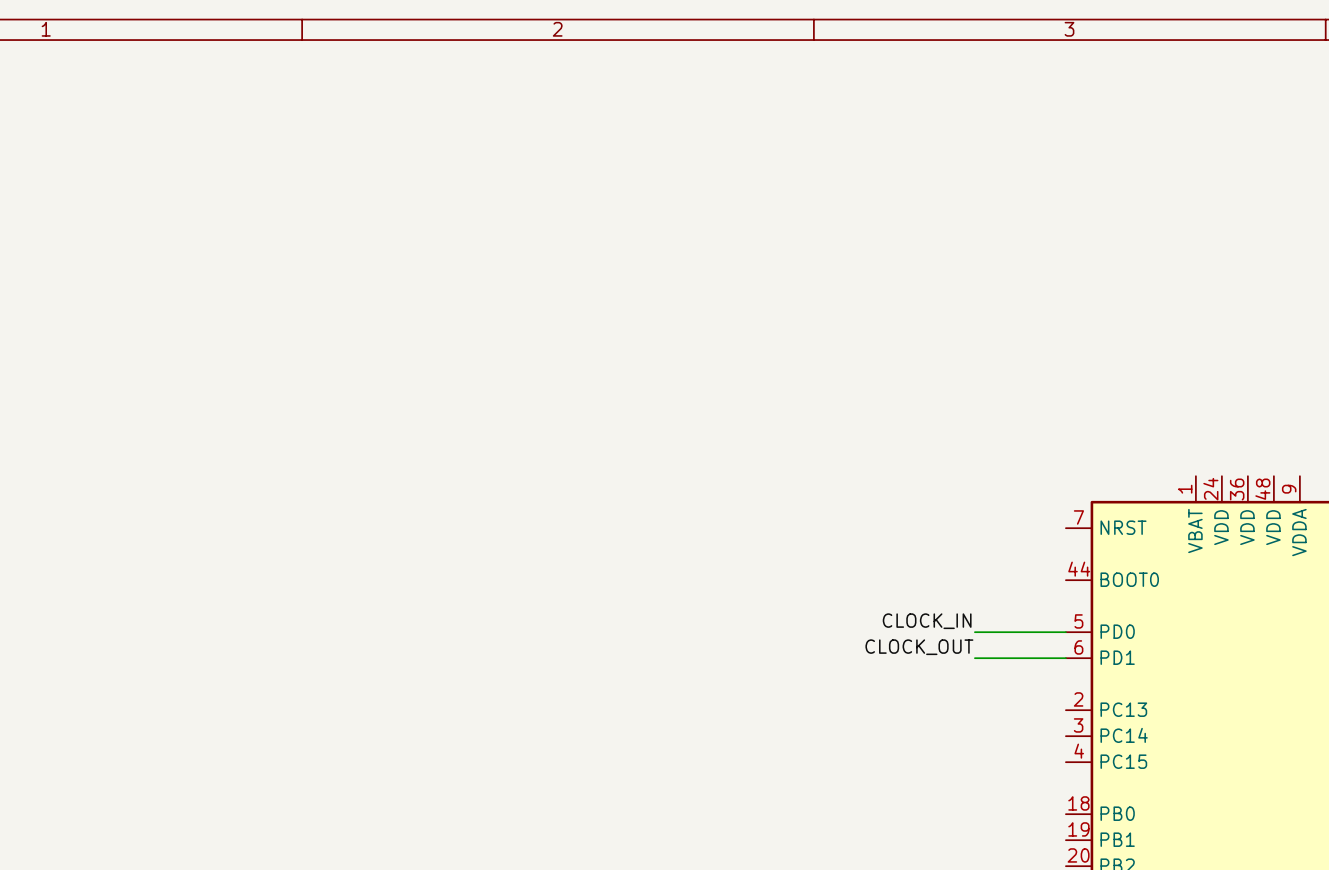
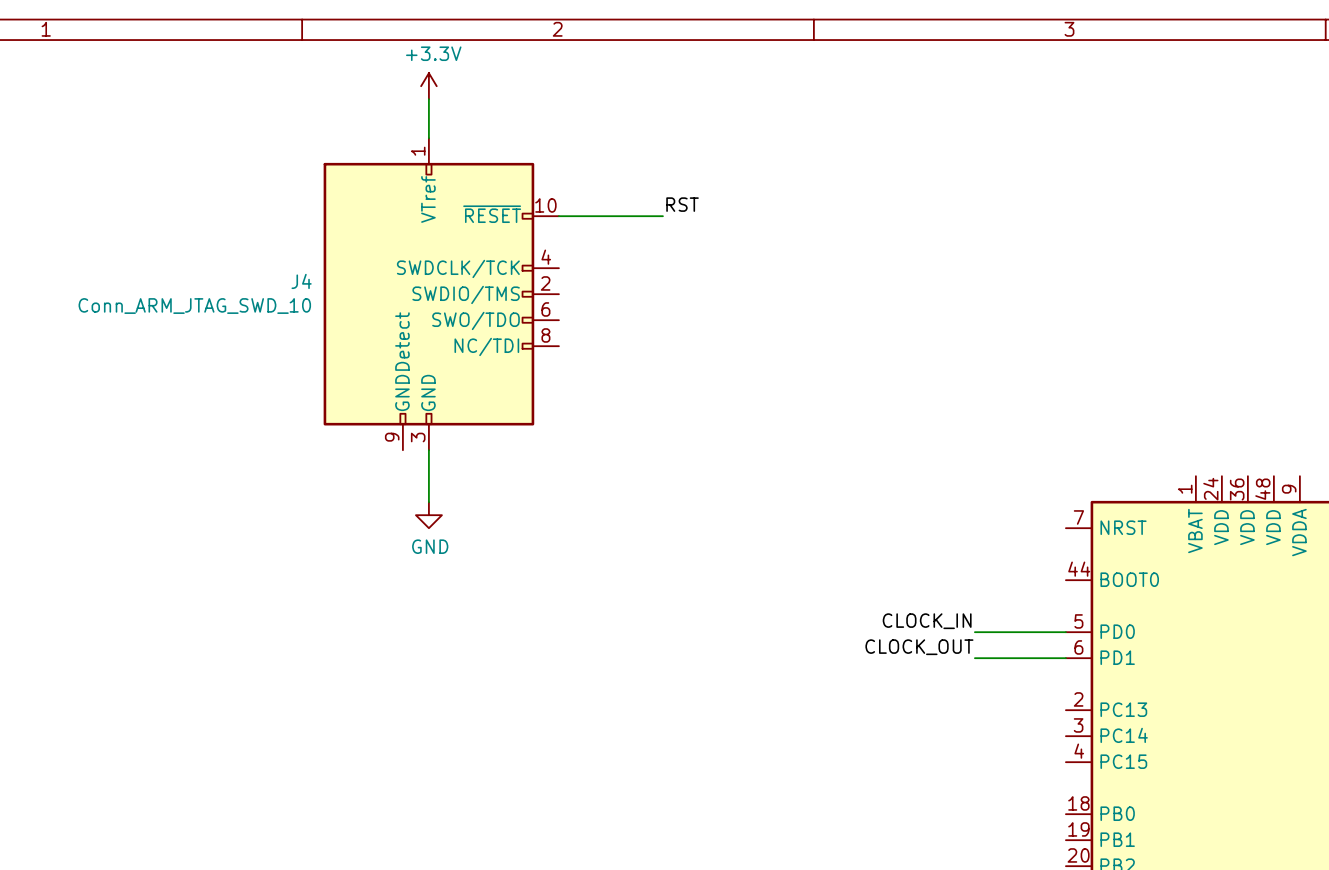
power symbol: none -> +3.3V (428, 86)
wire: none -> (428, 99) (428, 138)
label: none -> RST (682, 204)
wire: none -> (558, 216) (662, 216)
J4: none -> Conn_ARM_JTAG_SWD_10 (441, 294)
wire: none -> (428, 450) (428, 502)
power symbol: none -> GND (428, 515)

